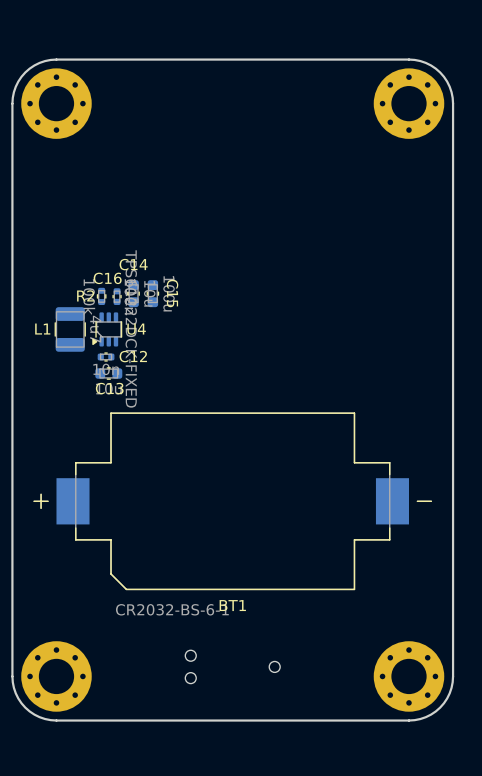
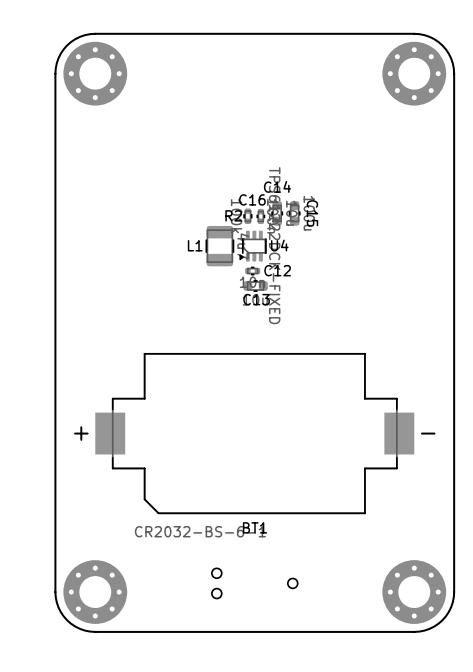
C14 position: (133, 293) -> (277, 213)
C15 position: (152, 293) -> (294, 213)
R2 position: (101, 296) -> (247, 216)
C16 position: (117, 296) -> (260, 216)
L1 position: (70, 329) -> (219, 246)
U4 position: (107, 329) -> (252, 246)
C12 position: (106, 356) -> (252, 271)
C13 position: (108, 373) -> (255, 286)

